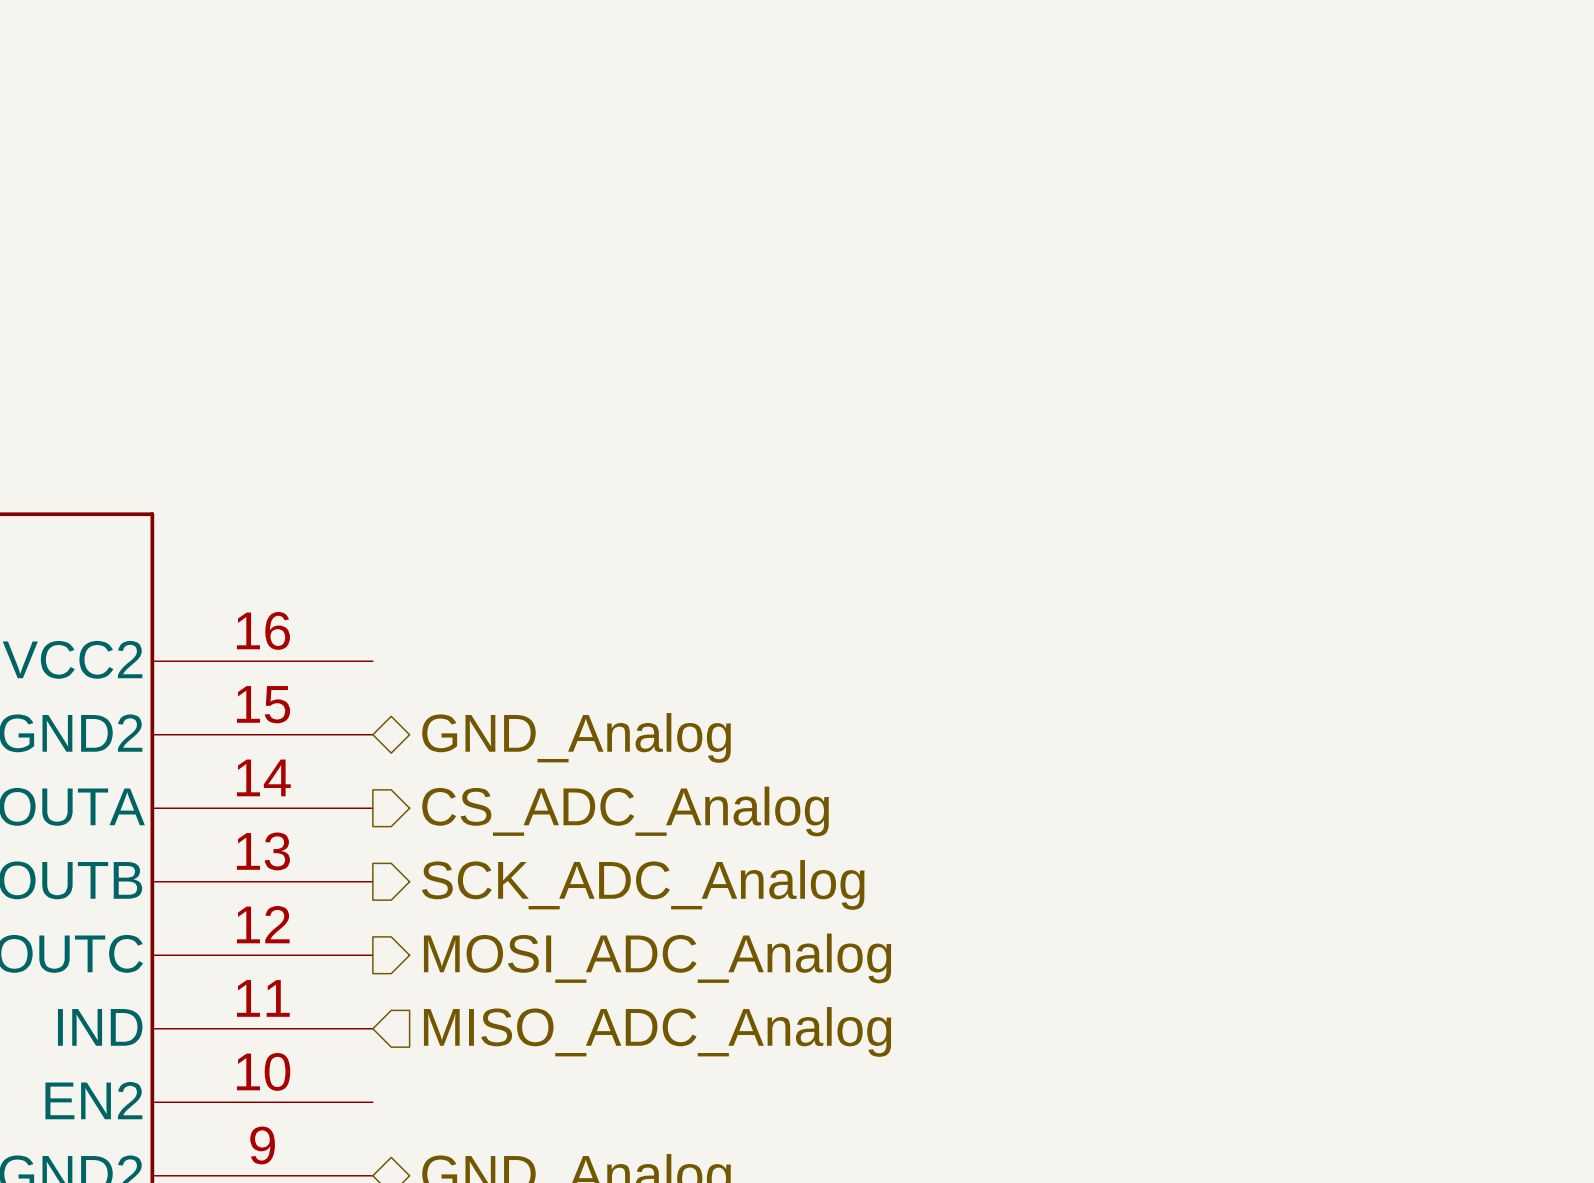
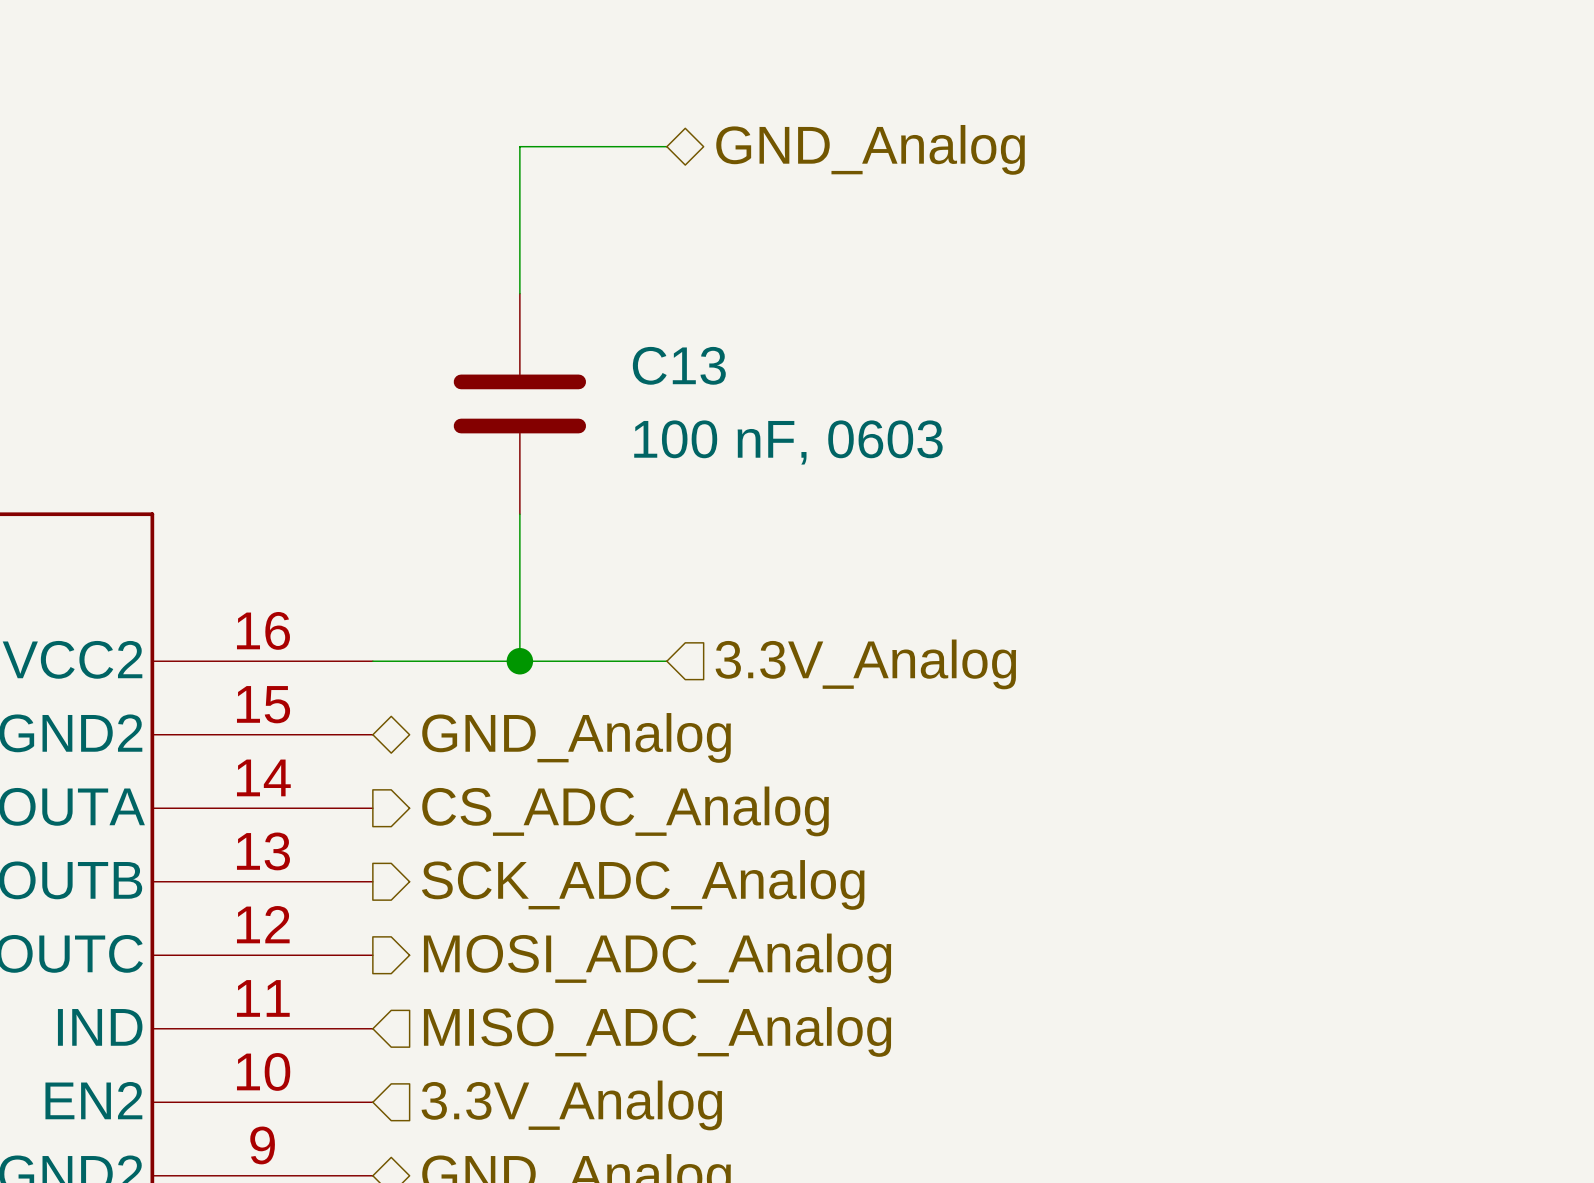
wire: none -> (666, 146) (519, 146) (519, 293)
hierarchical label: none -> GND_Analog (870, 149)
C13: none -> 100 nF, 0603 (519, 403)
wire: none -> (519, 514) (519, 661)
wire: none -> (372, 661) (666, 661)
junction: none -> (519, 661)
hierarchical label: none -> 3.3V_Analog (865, 664)
hierarchical label: none -> 3.3V_Analog (571, 1105)

